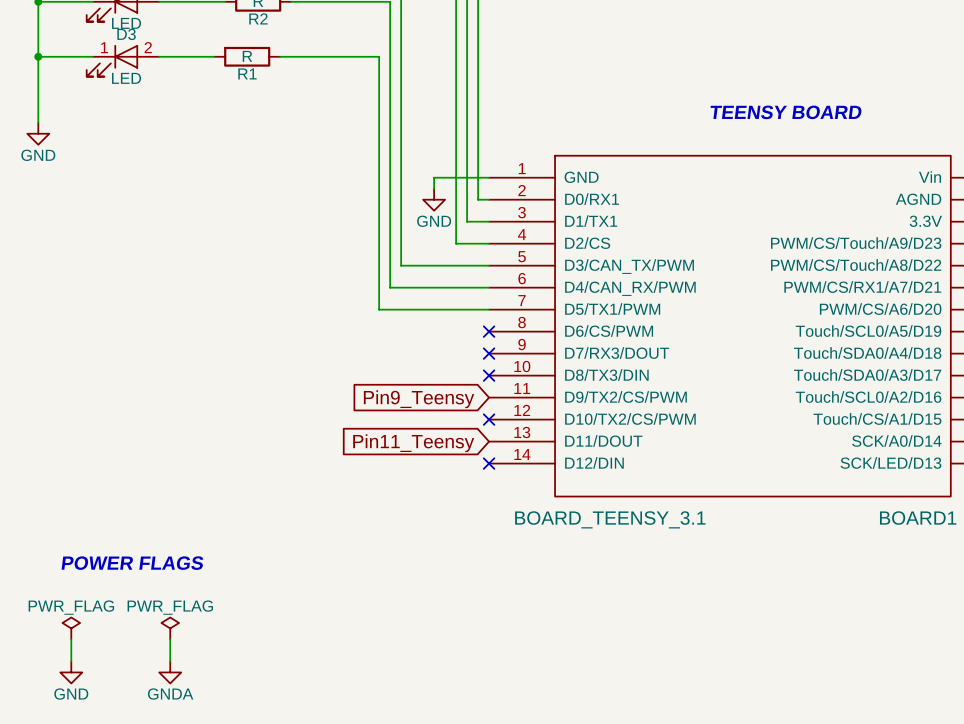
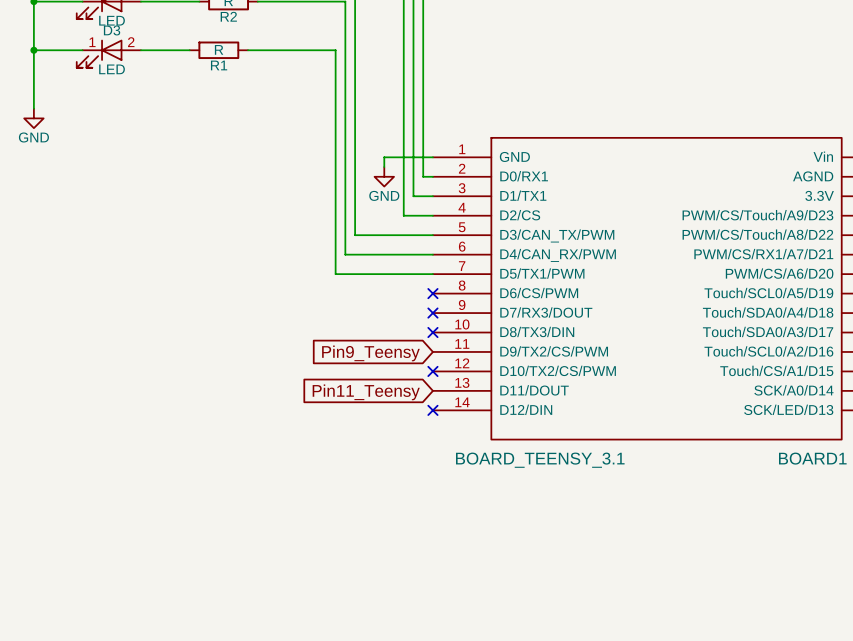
text: TEENSY BOARD (786, 112) -> none
text: POWER FLAGS (132, 563) -> none
power symbol: PWR_FLAG (71, 628) -> none
power symbol: PWR_FLAG (170, 628) -> none
wire: (71, 639) (71, 661) -> none
wire: (170, 639) (170, 661) -> none
power symbol: GND (71, 672) -> none
power symbol: GNDA (170, 672) -> none

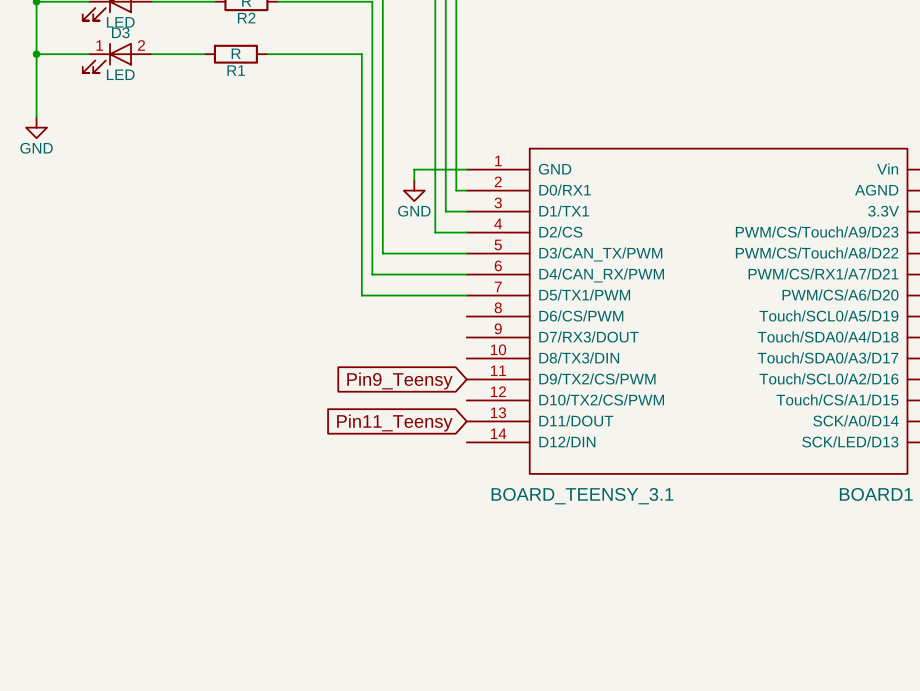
no-connect mark: (432, 293) -> none
no-connect mark: (432, 313) -> none
no-connect mark: (432, 332) -> none
no-connect mark: (432, 371) -> none
no-connect mark: (432, 410) -> none

